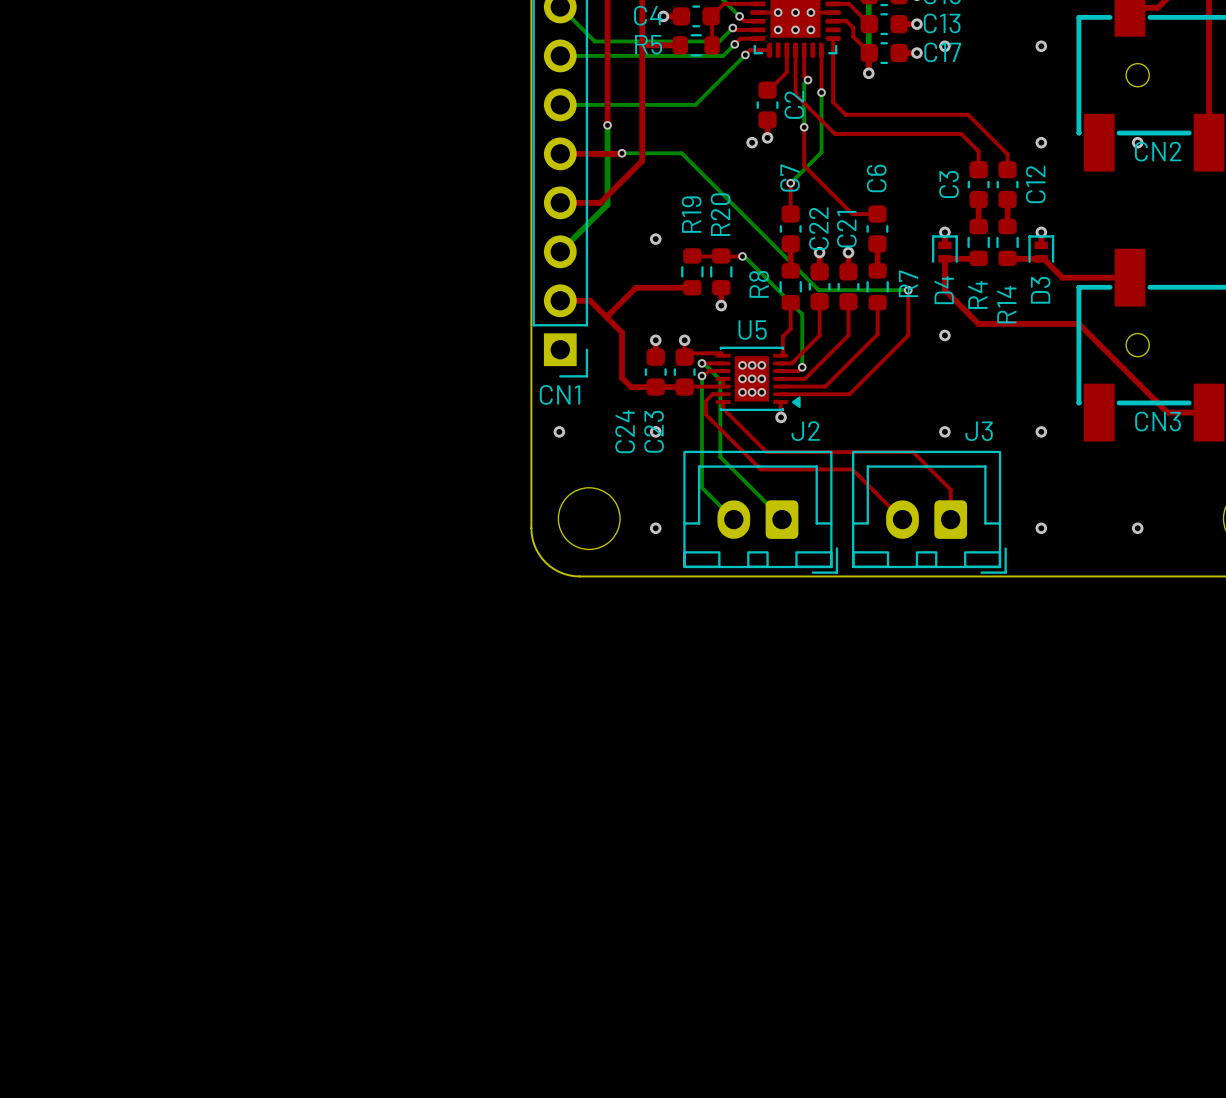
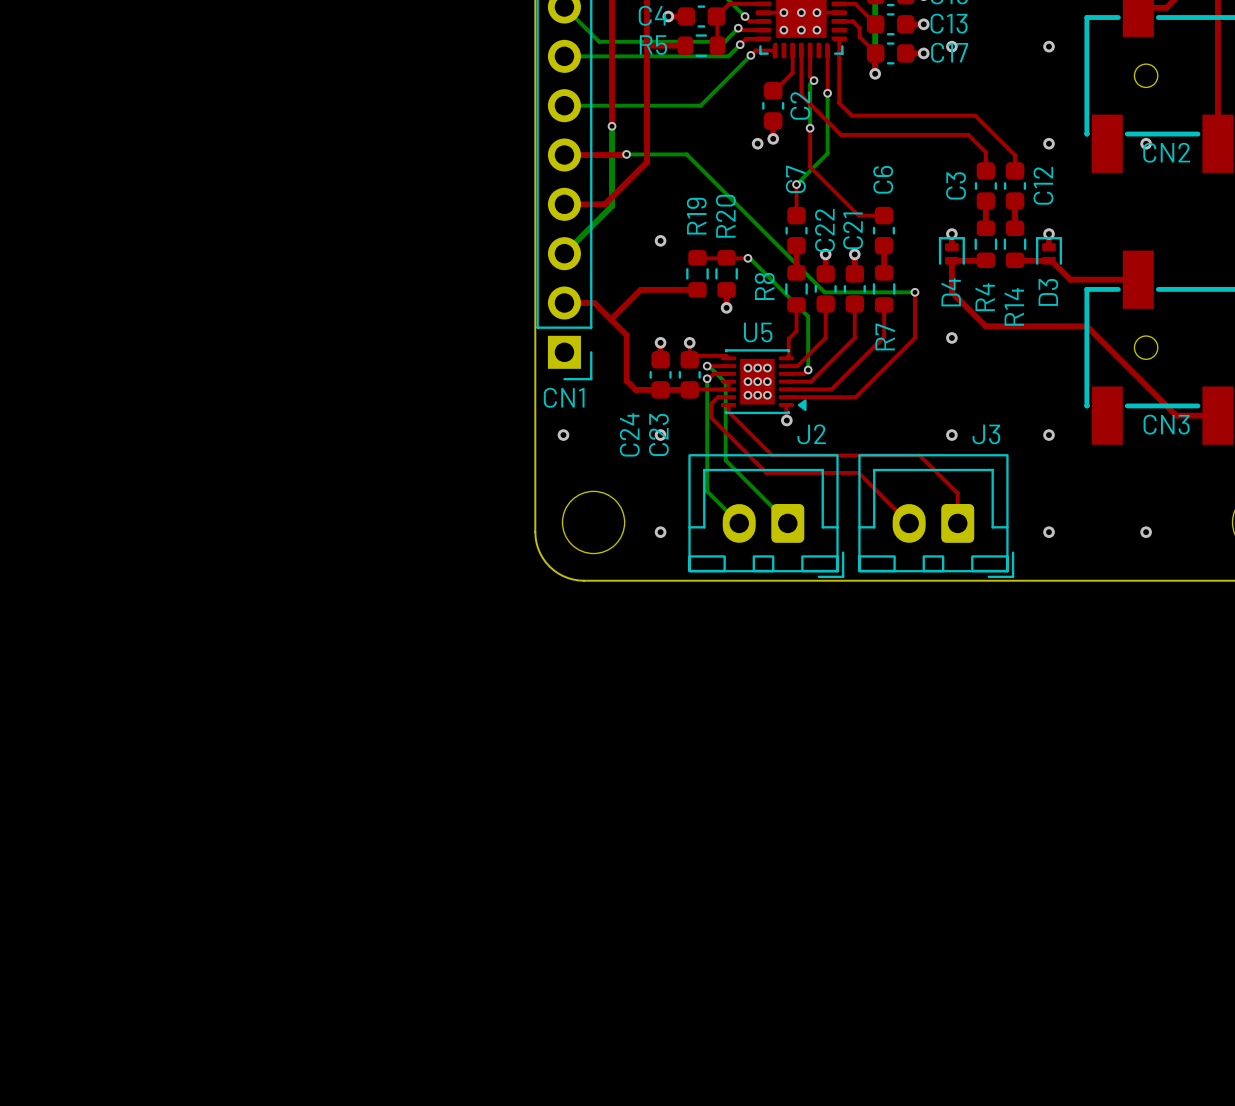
R7 name position: R7 (908, 283) -> R7 (885, 336)

